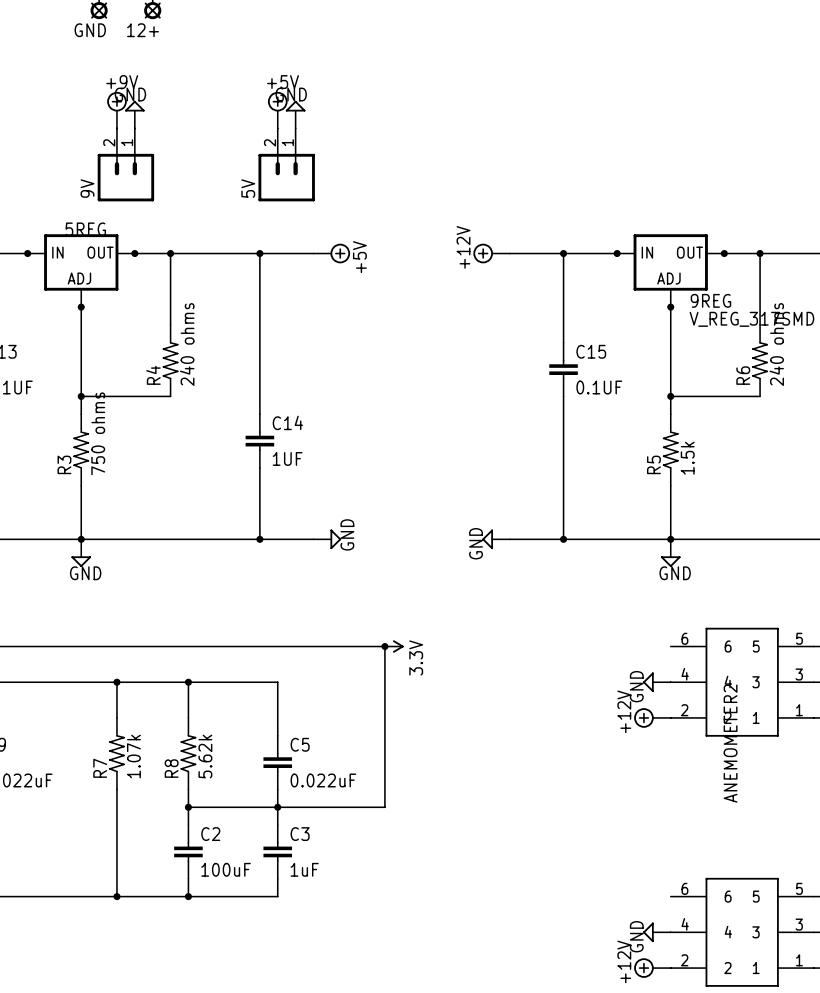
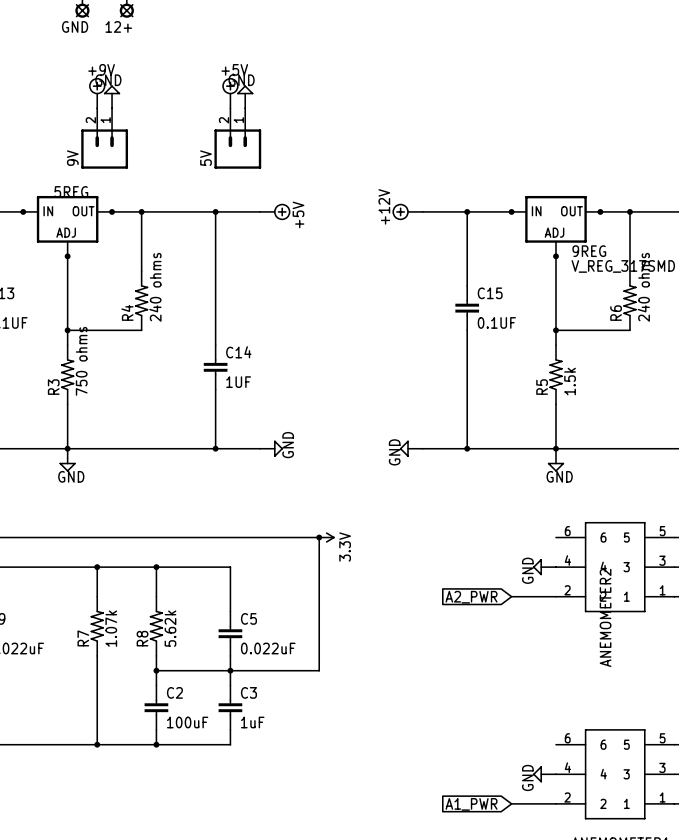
power symbol: +12V (652, 717) -> none
global label: none -> A2_PWR (471, 597)
global label: none -> A1_PWR (471, 804)
power symbol: +12V (652, 968) -> none

